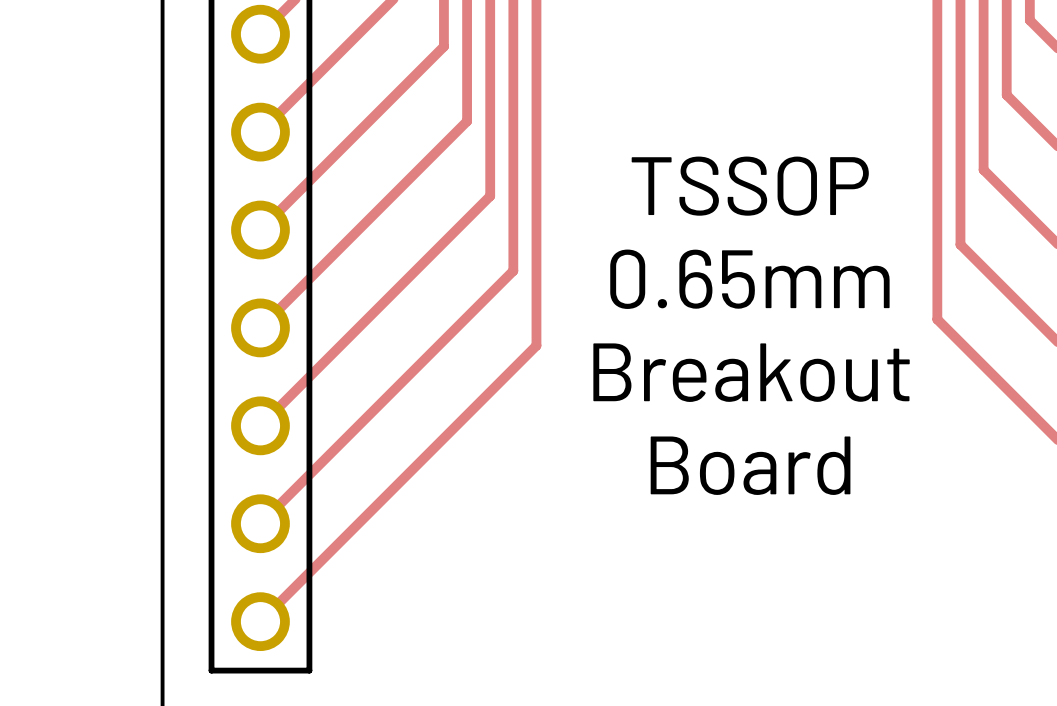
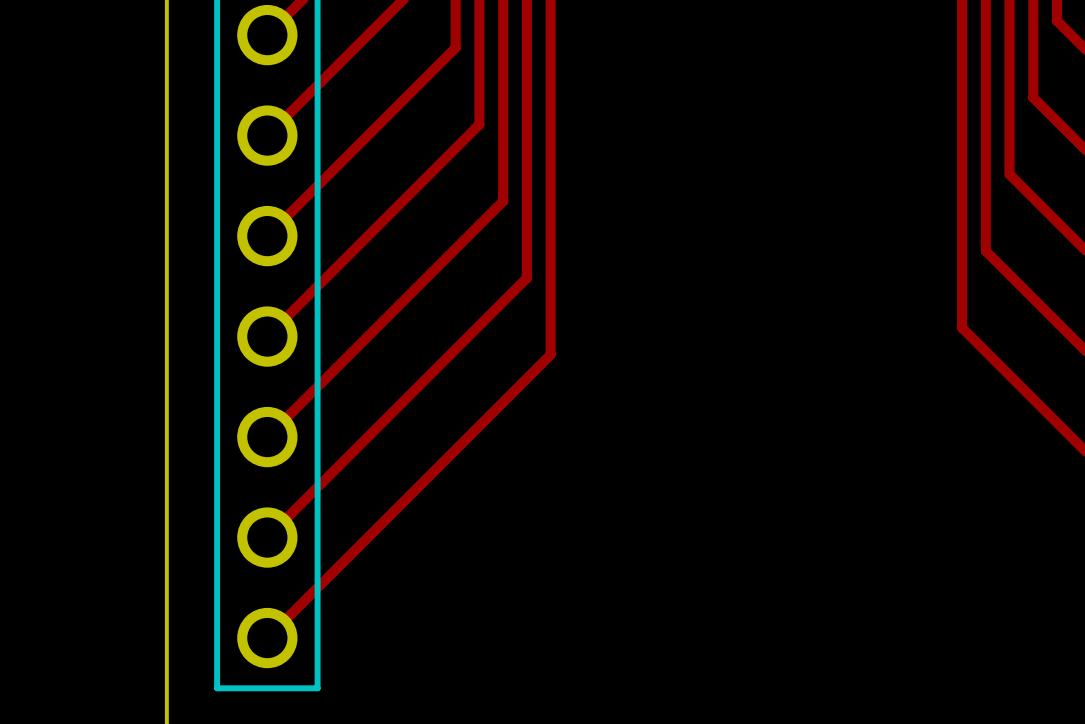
text: TSSOP (750, 186) -> none
text: 0.65mm (749, 279) -> none
text: Breakout (751, 372) -> none
text: Board (750, 465) -> none

